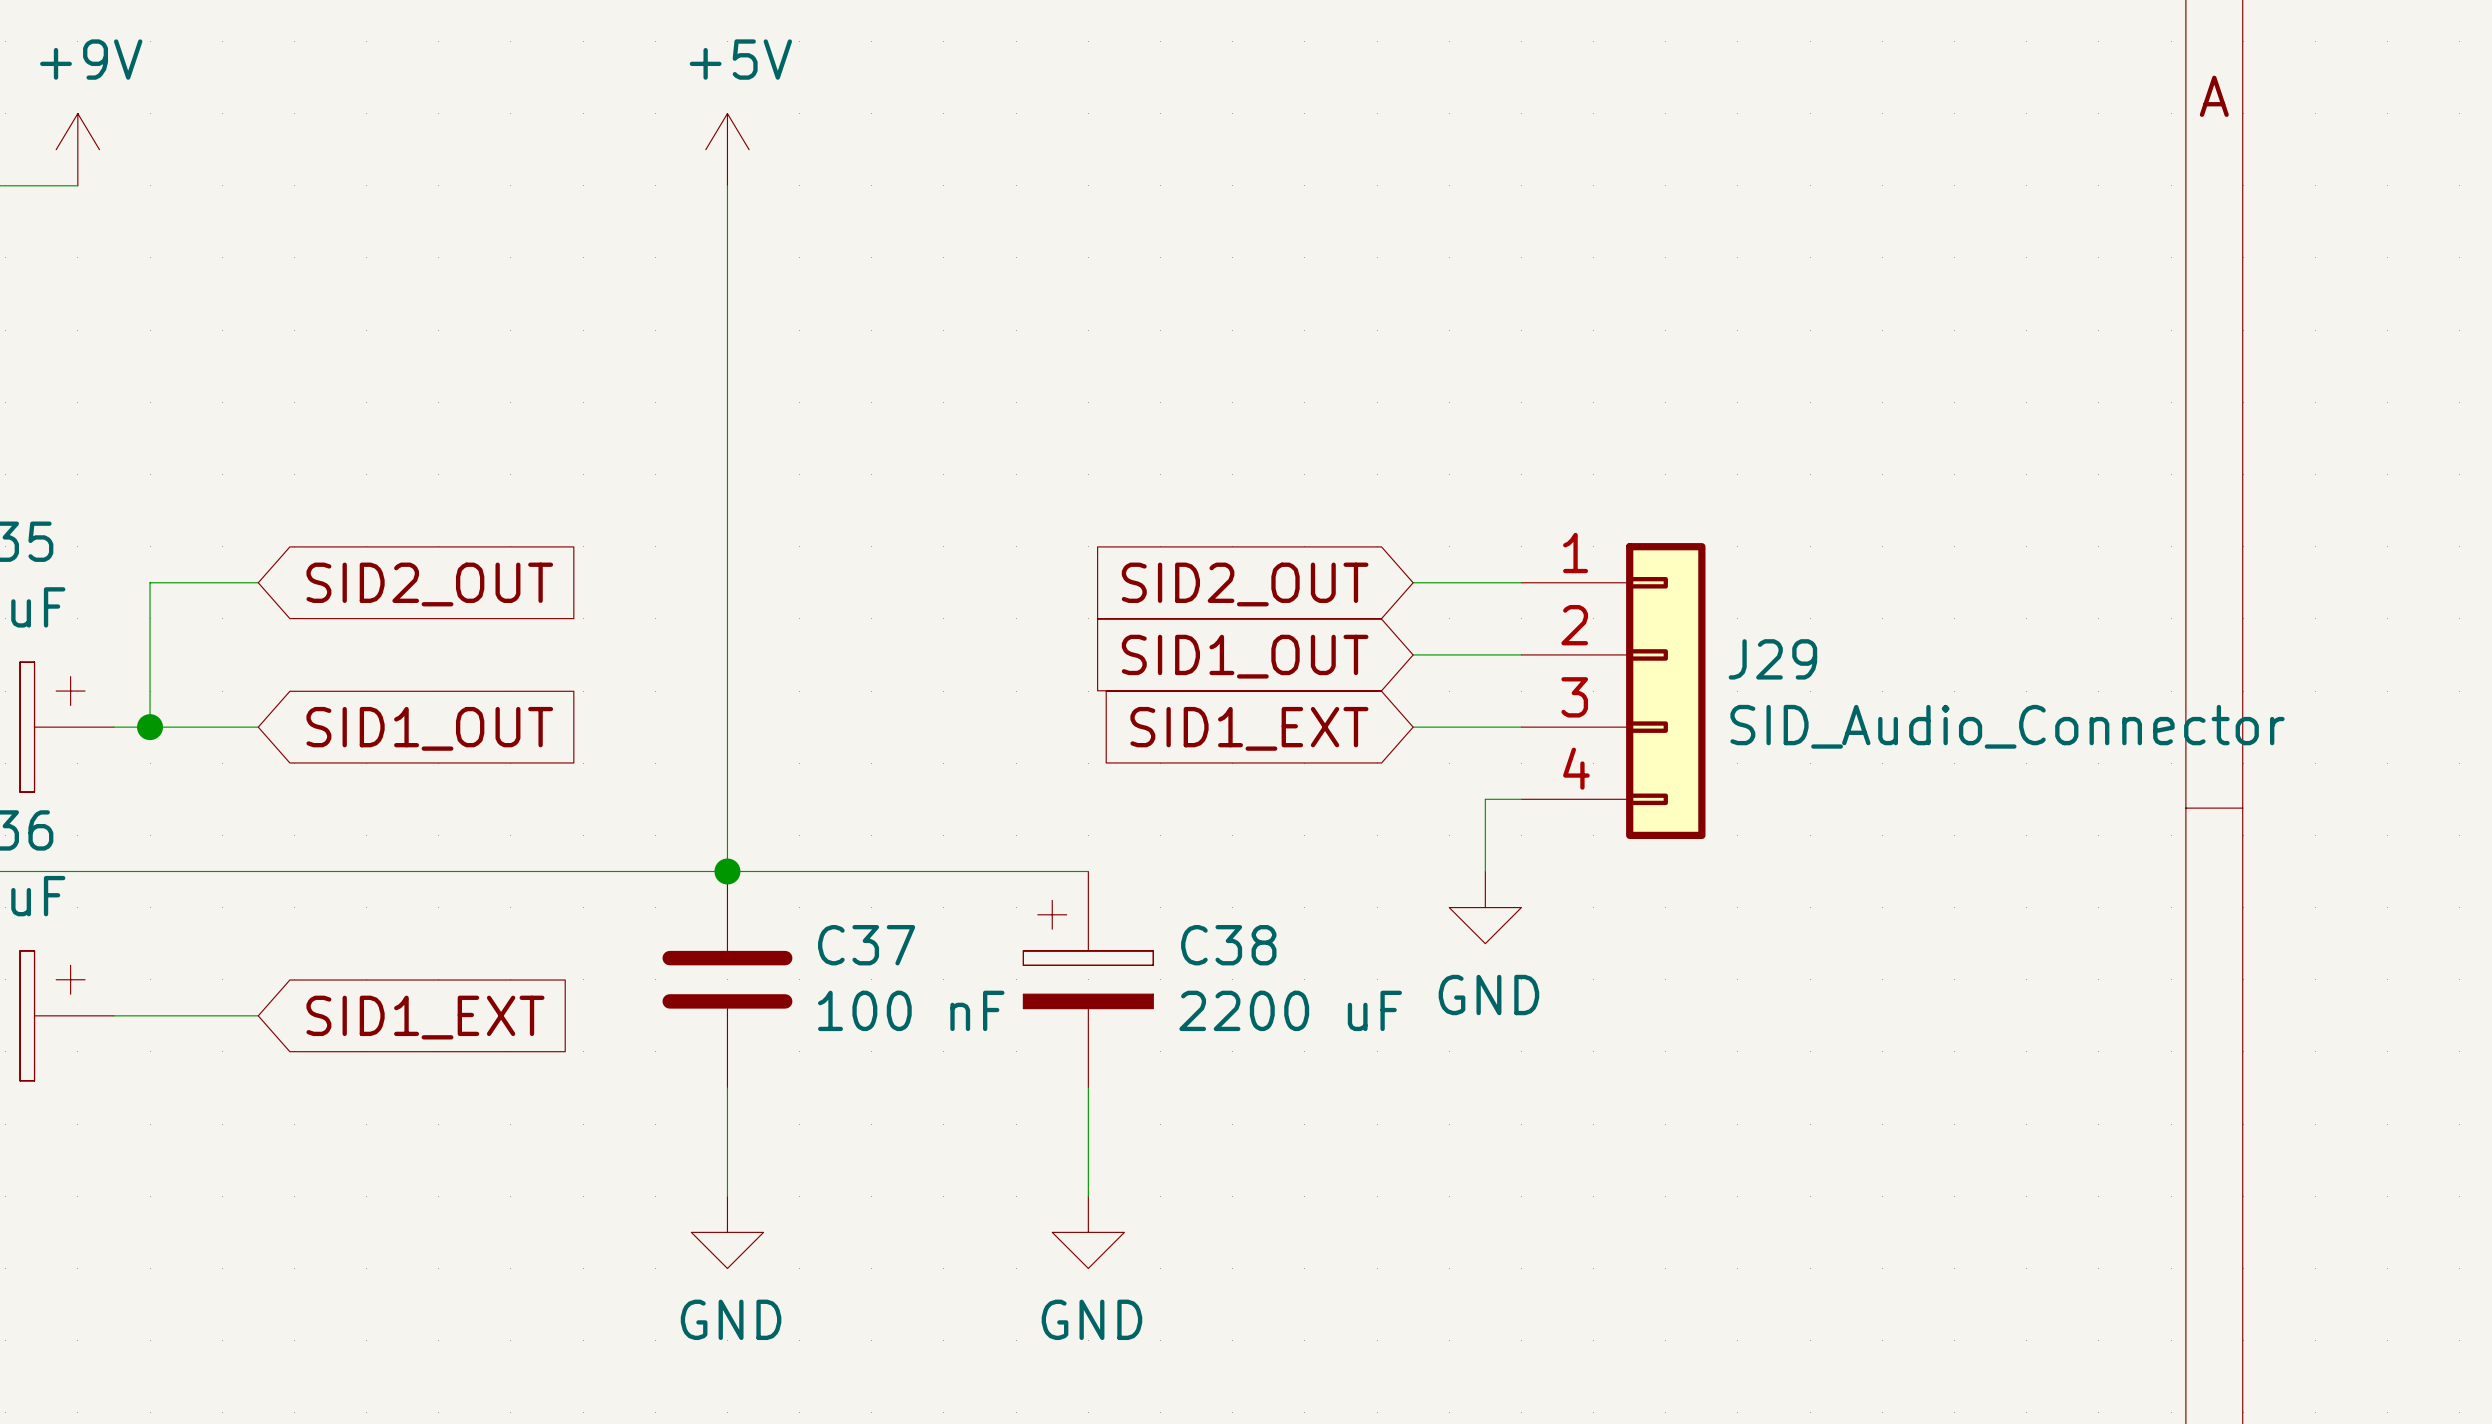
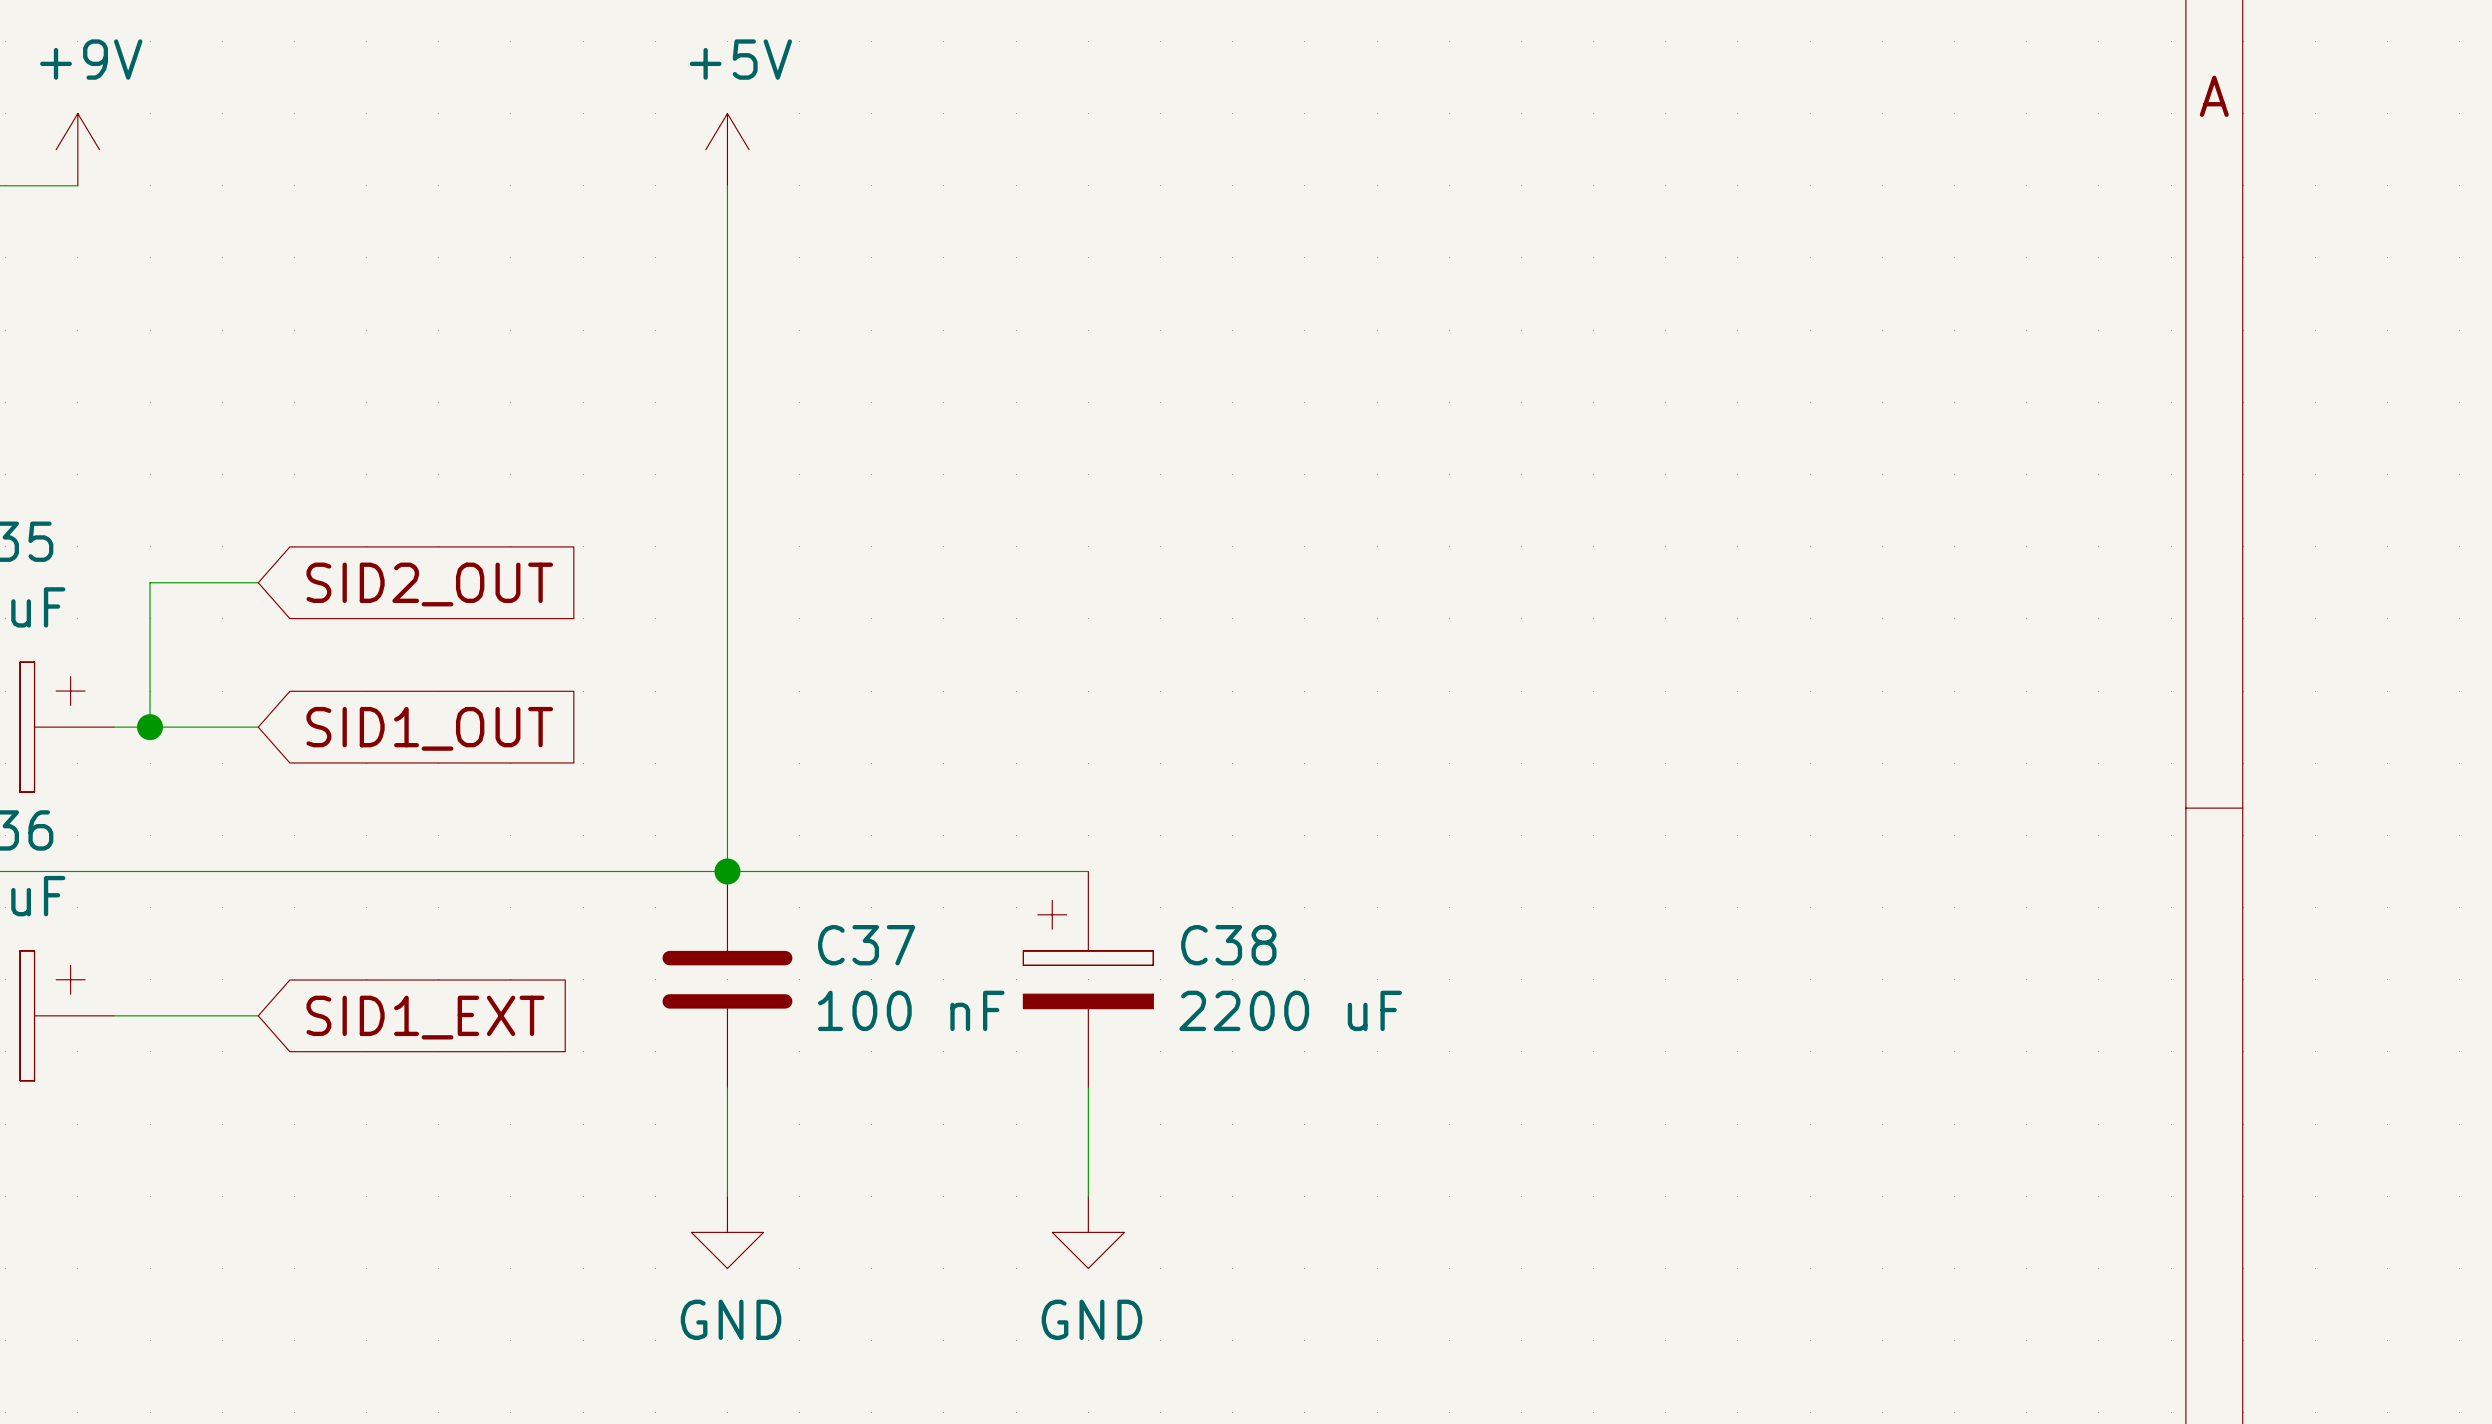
wire: (1413, 582) (1521, 582) -> none
global label: SID2_OUT (1245, 584) -> none
wire: (1413, 654) (1521, 654) -> none
global label: SID1_OUT (1245, 656) -> none
J29: SID_Audio_Connector (1613, 691) -> none
wire: (1413, 727) (1521, 727) -> none
global label: SID1_EXT (1249, 728) -> none
wire: (1521, 799) (1485, 799) (1485, 871) -> none
power symbol: GND (1485, 907) -> none

